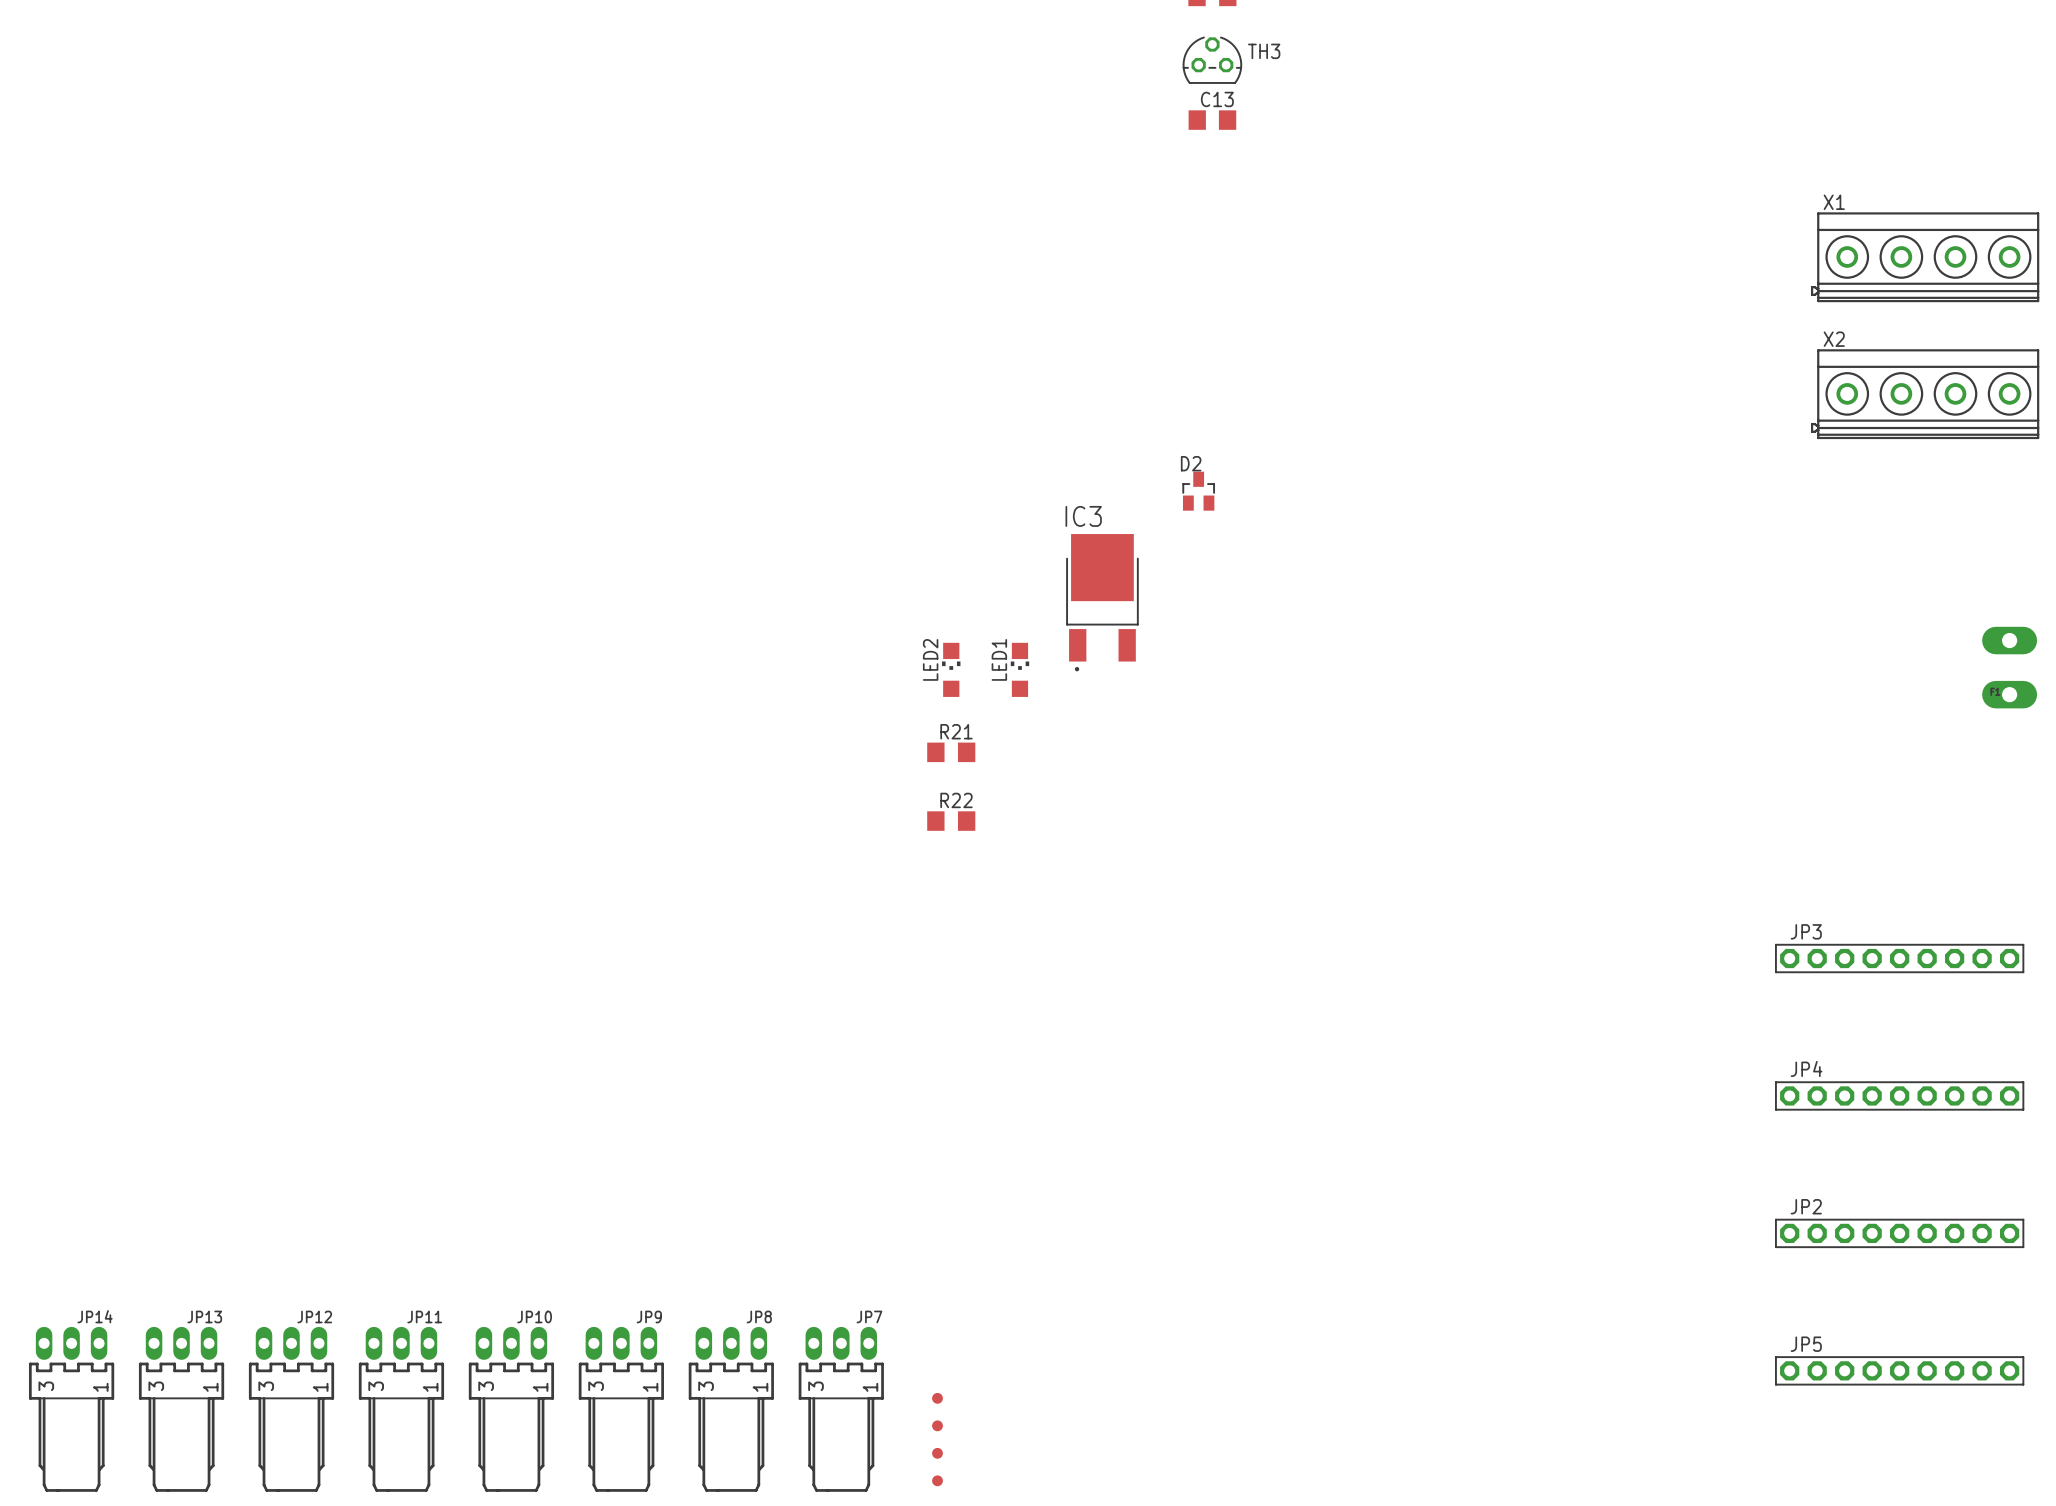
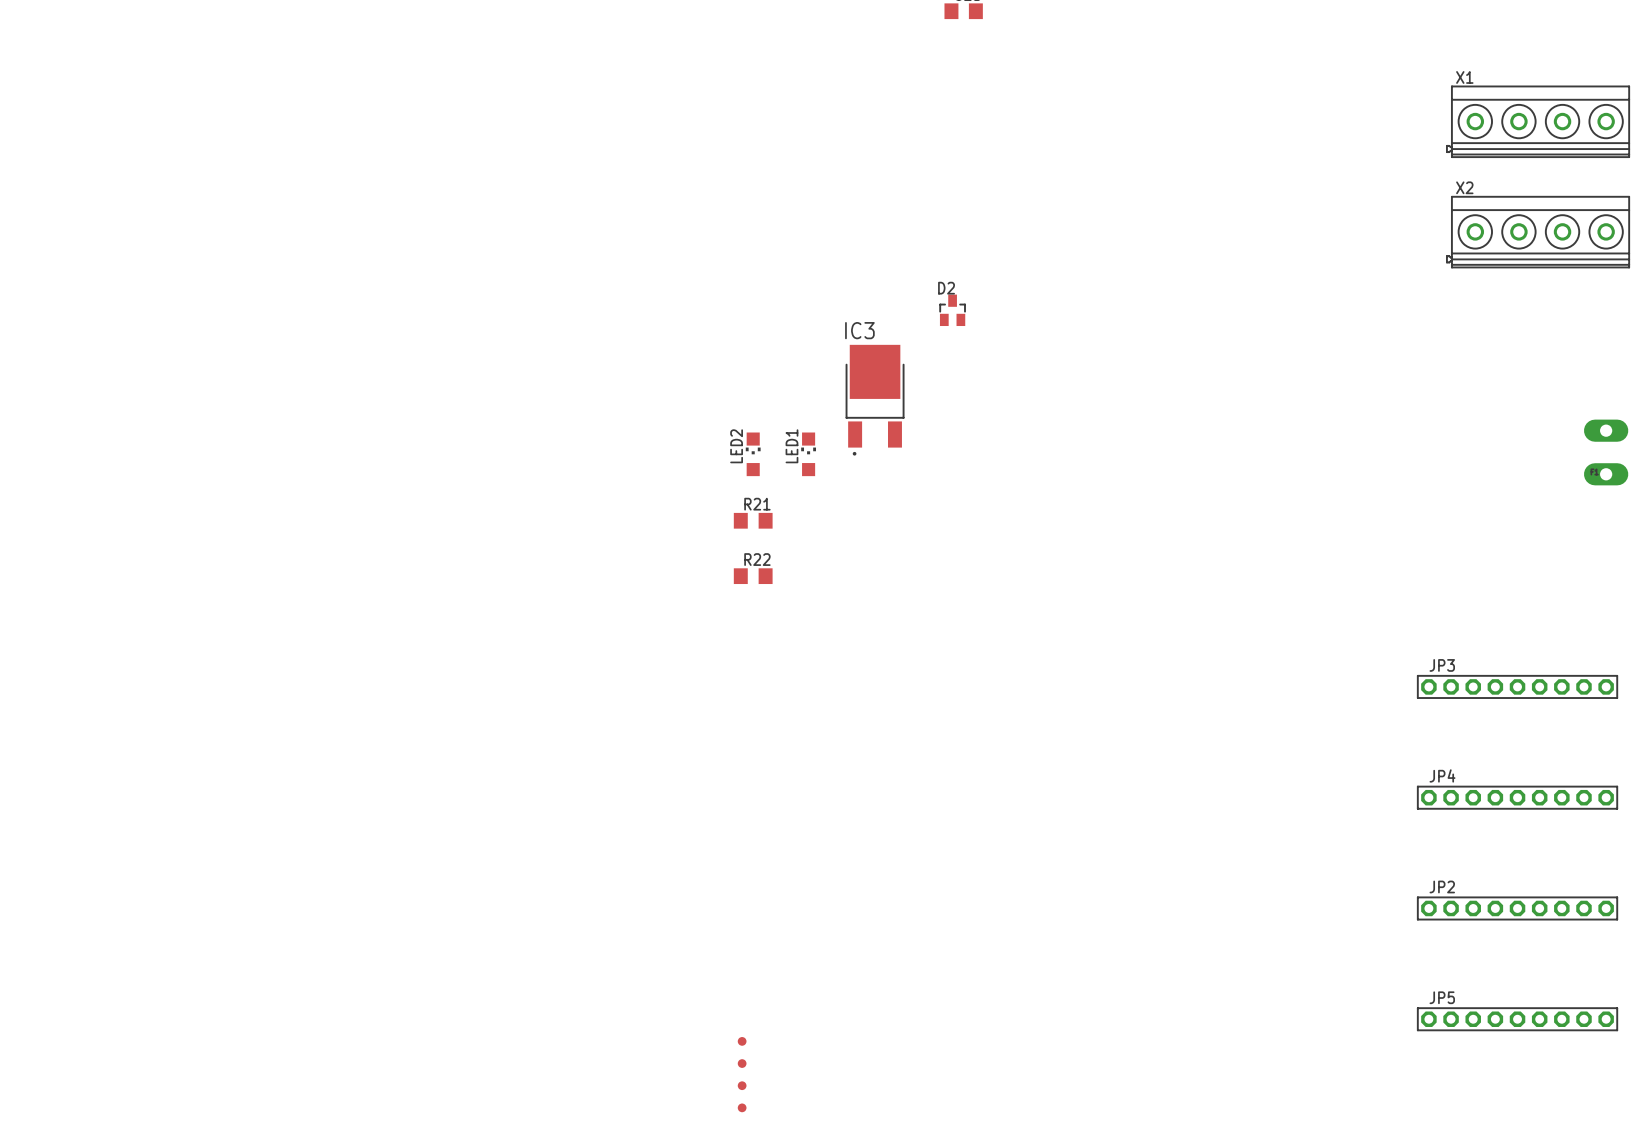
JP14: (71, 1409) -> none
JP13: (181, 1409) -> none
JP12: (291, 1409) -> none
JP11: (401, 1409) -> none
JP10: (511, 1409) -> none
JP9: (621, 1409) -> none
JP8: (731, 1409) -> none
JP7: (841, 1409) -> none

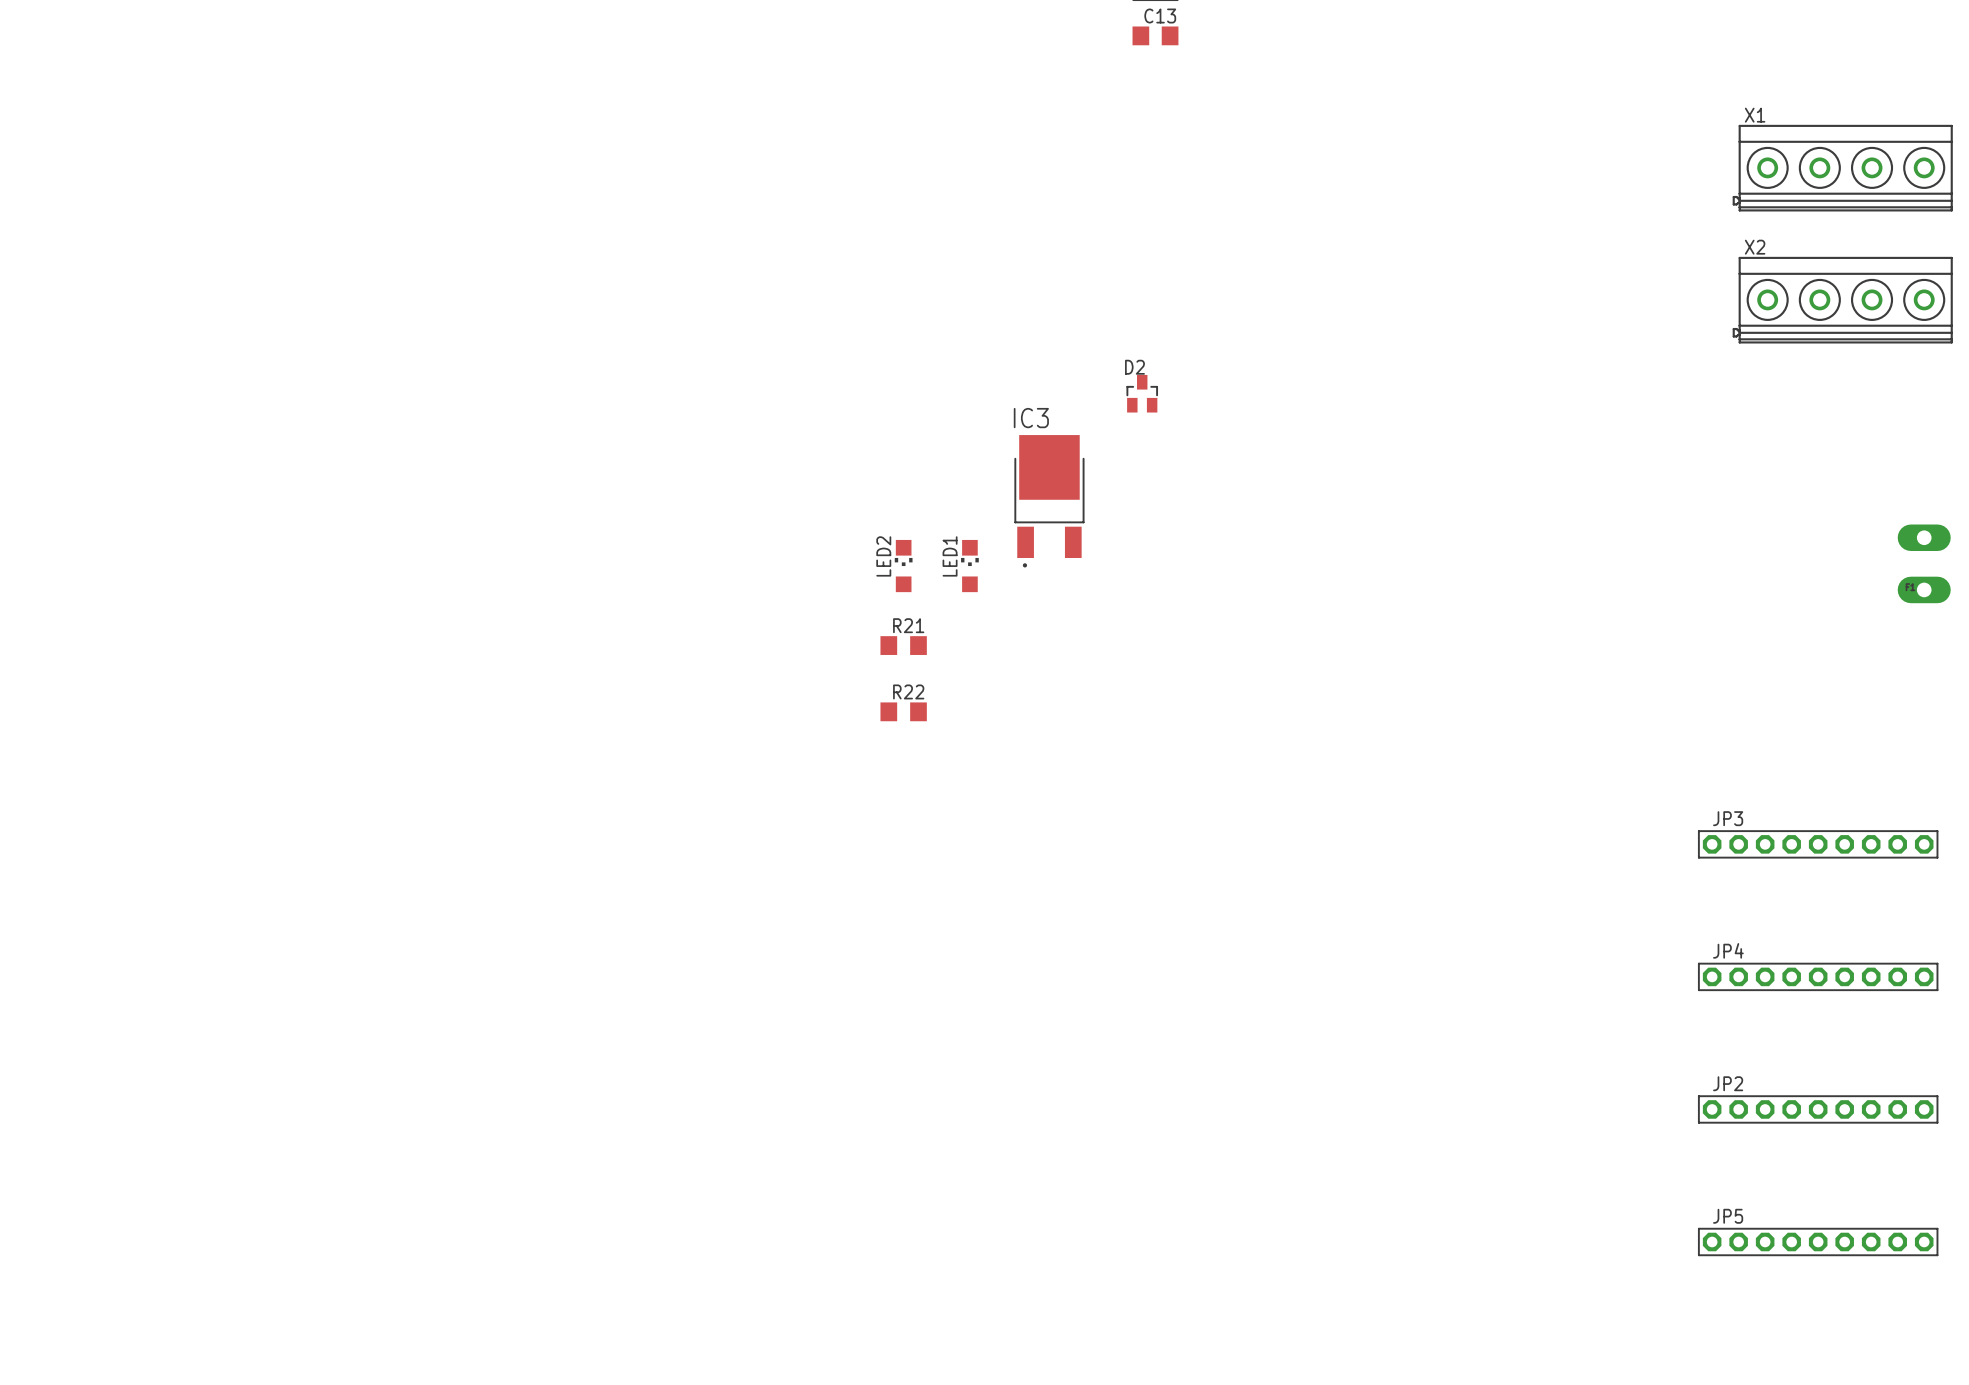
part: (742, 1041) -> none
part: (742, 1063) -> none
part: (742, 1085) -> none
part: (742, 1107) -> none

